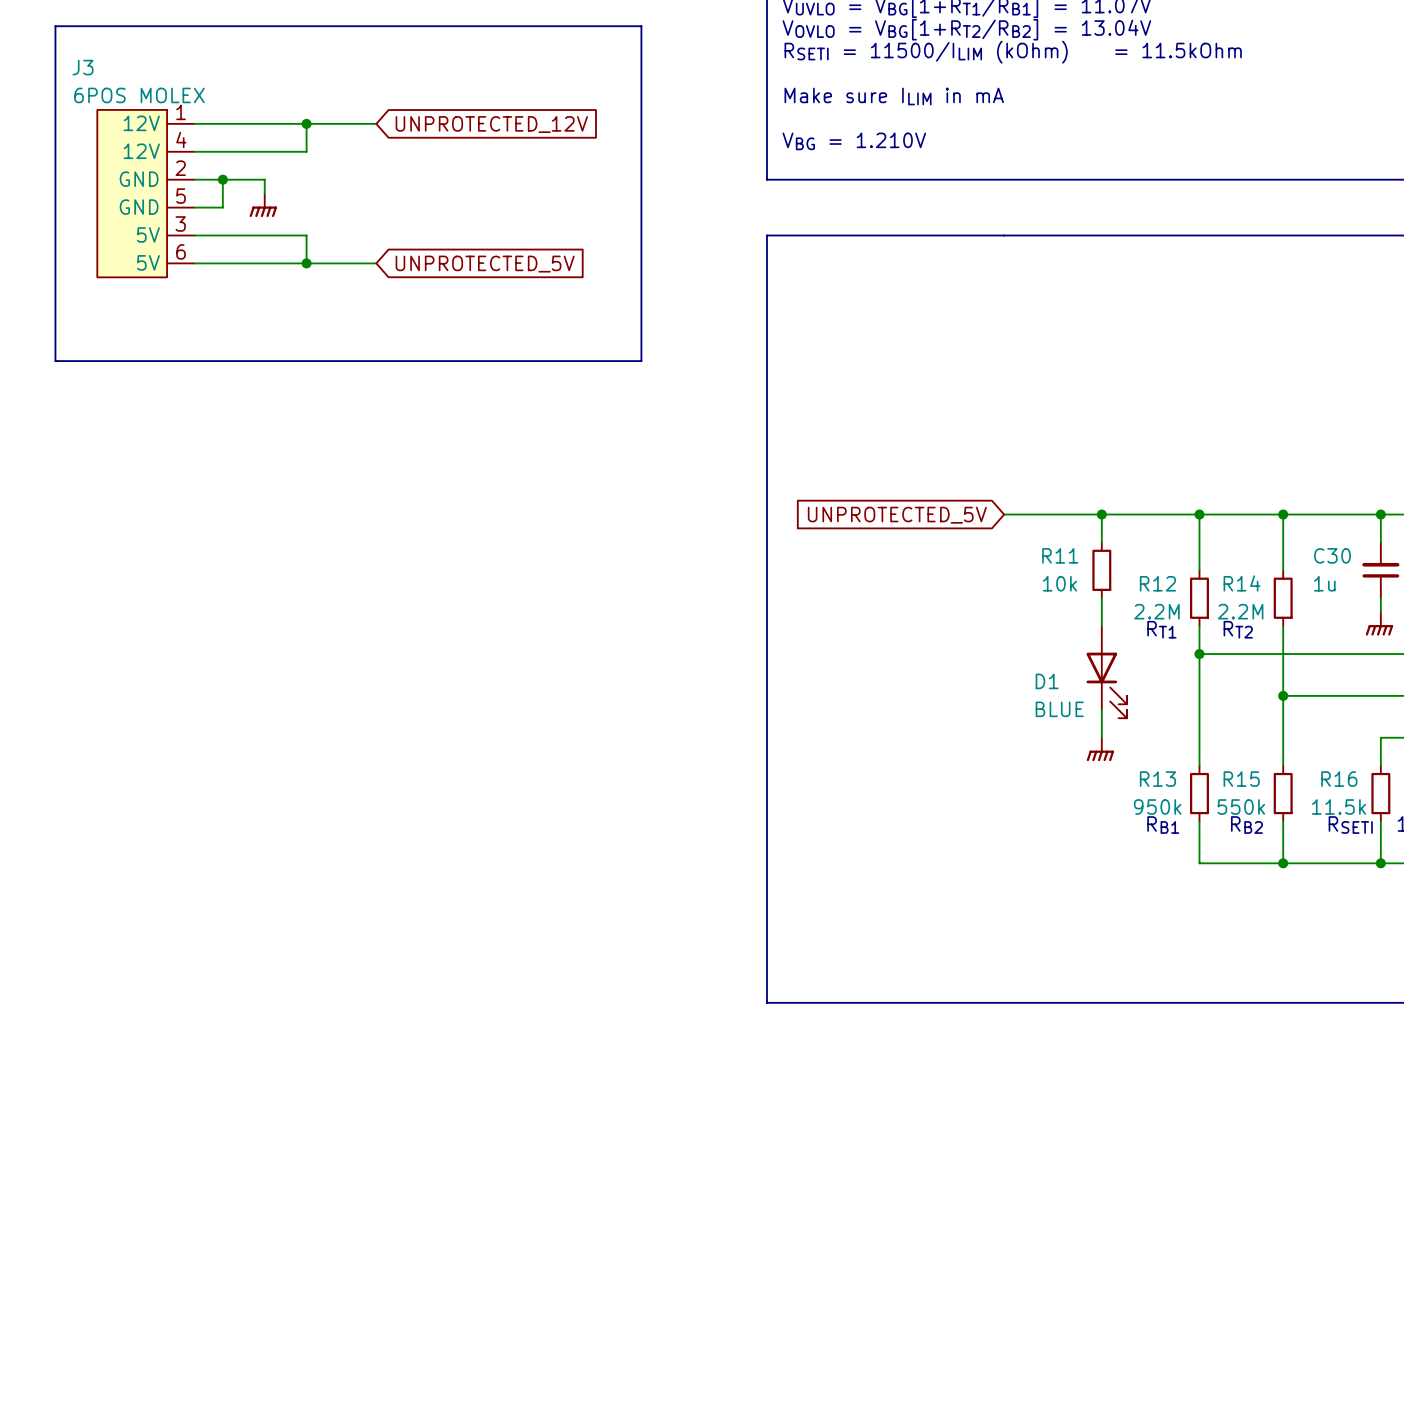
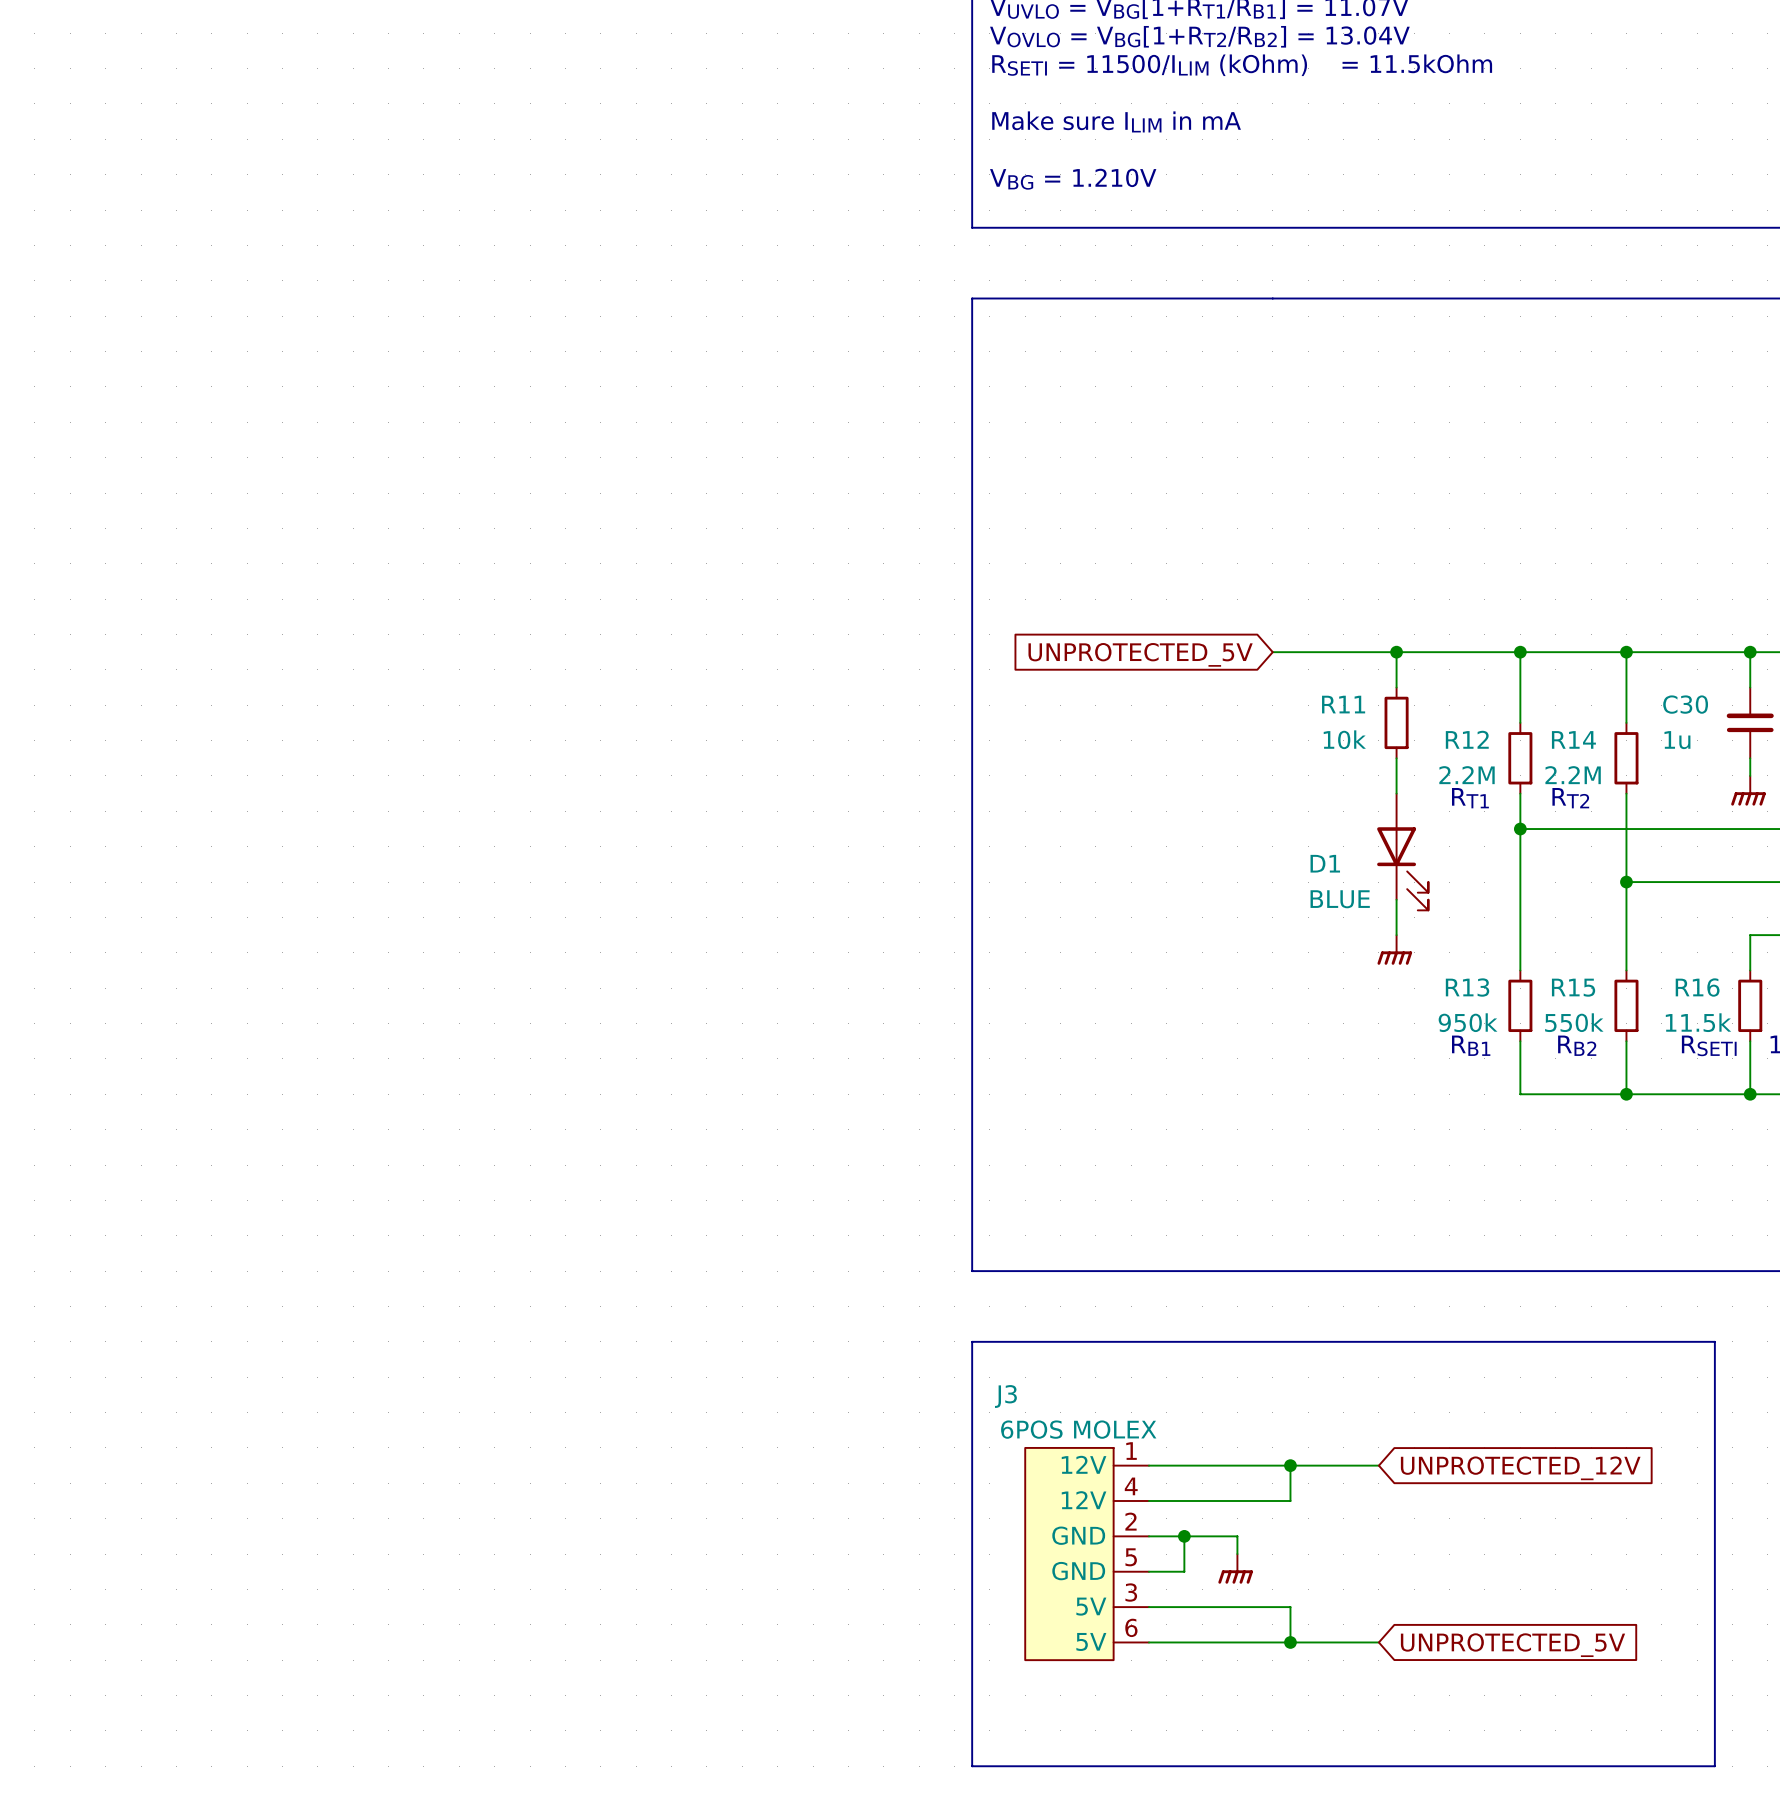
line: (55, 26) (641, 26) (641, 361) (55, 361) (55, 26) -> none
wire: (194, 123) (376, 123) -> none
wire: (306, 123) (306, 151) (194, 151) -> none
junction: (306, 123) -> none
global label: UNPROTECTED_12V (491, 124) -> none
wire: (194, 179) (264, 179) (264, 193) -> none
wire: (222, 179) (222, 207) (194, 207) -> none
junction: (222, 179) -> none
J3 position: (146, 193) -> (1087, 1554)
power symbol: (263, 205) -> none
wire: (194, 235) (306, 235) (306, 263) -> none
wire: (194, 263) (376, 263) -> none
junction: (306, 263) -> none
global label: UNPROTECTED_5V (485, 264) -> none
line: none -> (972, 1341) (972, 1766) (1714, 1766) (1714, 1341) (972, 1341)
wire: none -> (1149, 1465) (1378, 1465)
wire: none -> (1290, 1465) (1290, 1500) (1149, 1500)
junction: none -> (1290, 1465)
global label: none -> UNPROTECTED_12V (1520, 1468)
wire: none -> (1149, 1536) (1237, 1536) (1237, 1554)
wire: none -> (1184, 1536) (1184, 1571) (1149, 1571)
junction: none -> (1184, 1536)
power symbol: none -> (1235, 1568)
wire: none -> (1149, 1607) (1290, 1607) (1290, 1642)
wire: none -> (1149, 1642) (1378, 1642)
junction: none -> (1290, 1642)
global label: none -> UNPROTECTED_5V (1512, 1645)

